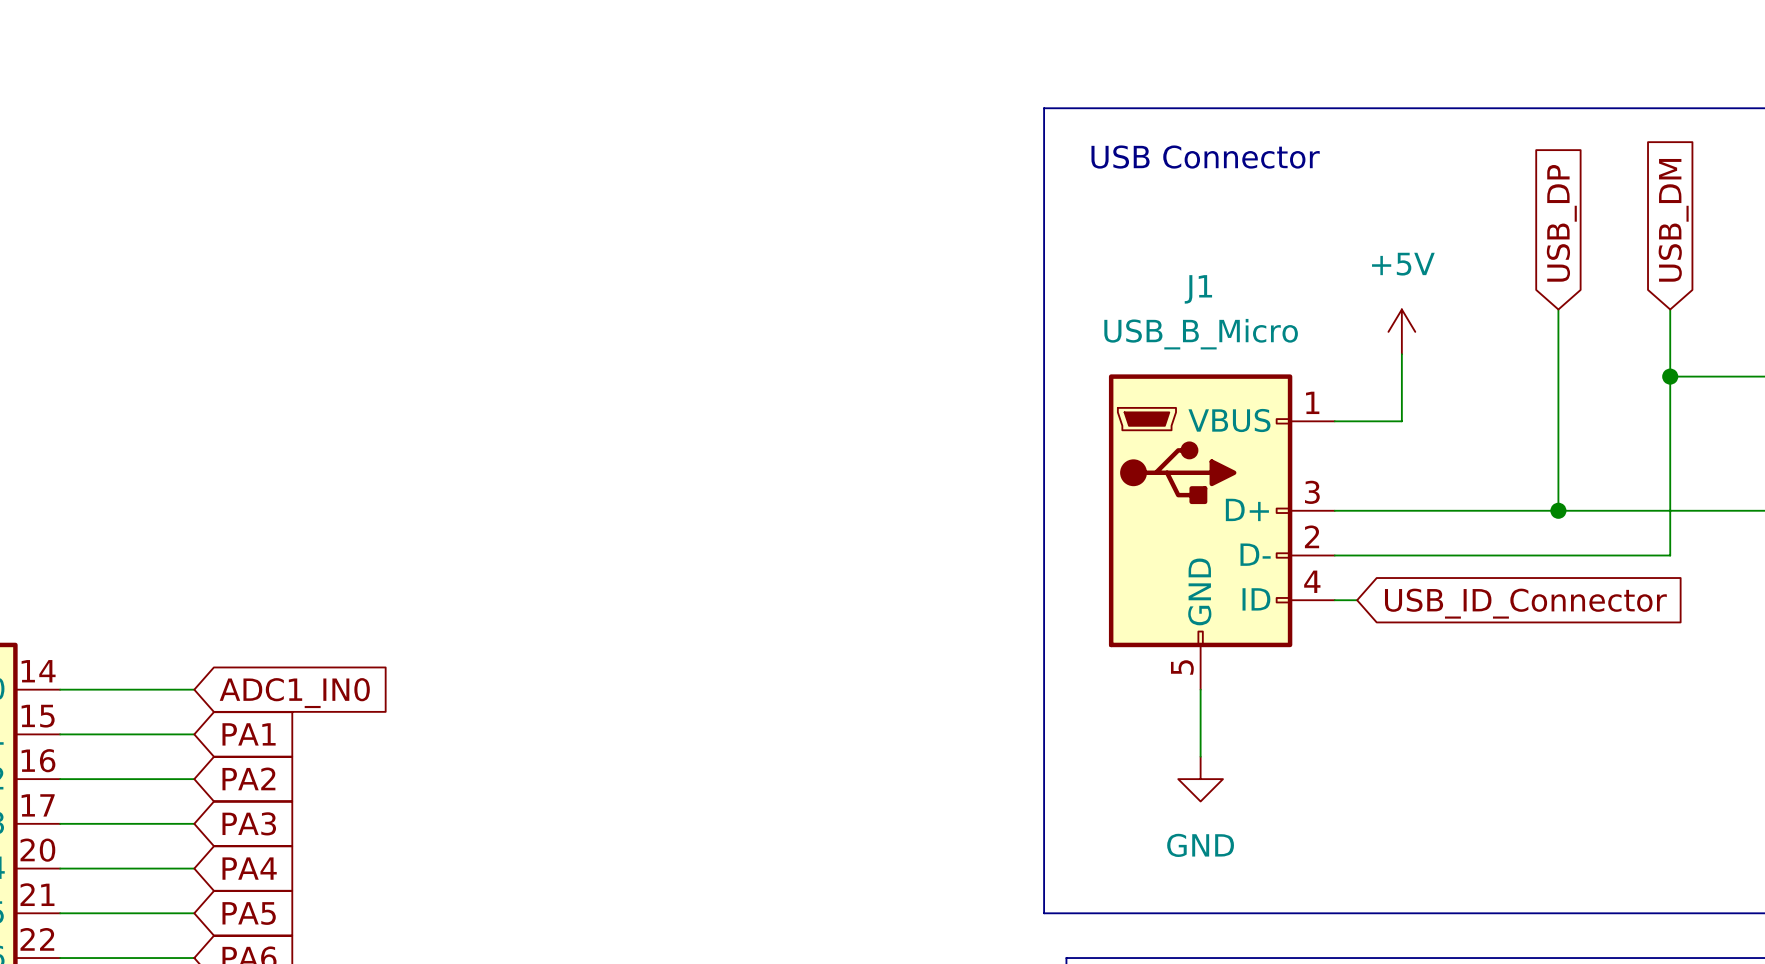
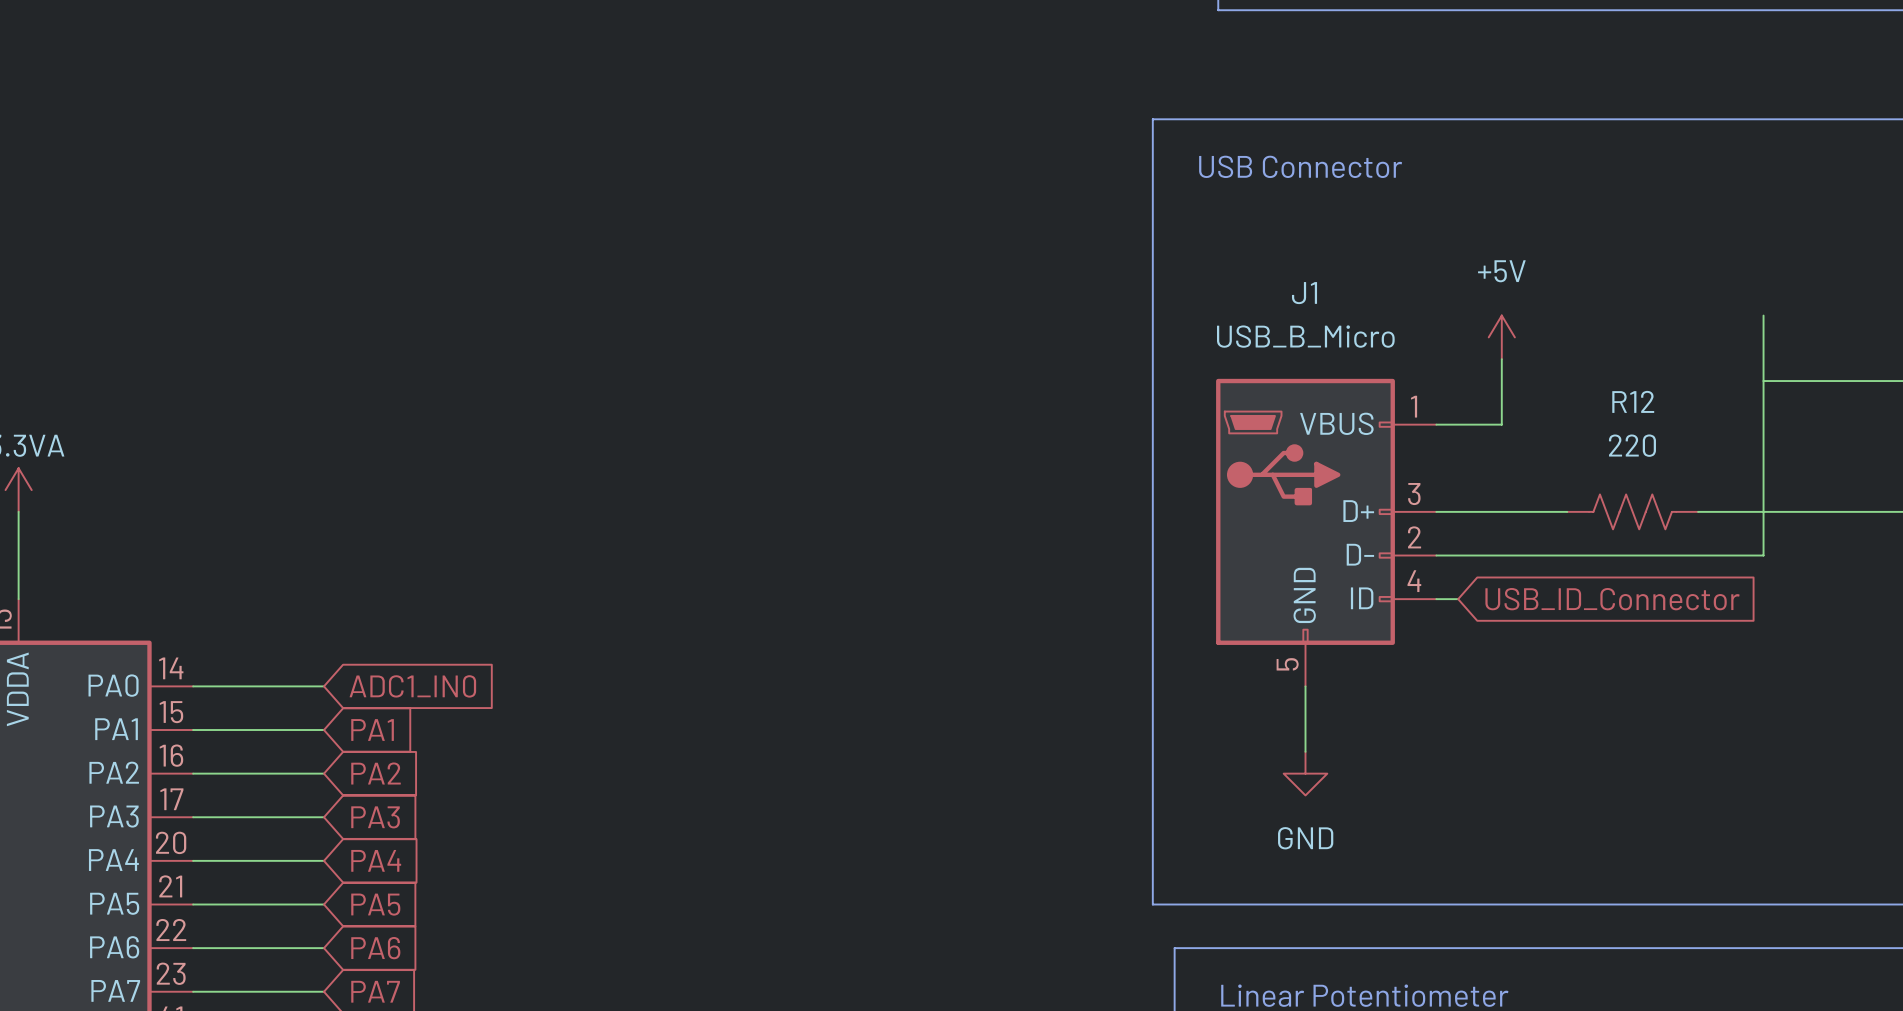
global label: USB_DM (1673, 220) -> none
global label: USB_DP (1561, 223) -> none
wire: (1558, 309) (1558, 510) -> none
junction: (1670, 376) -> none
wire: (1468, 510) (1603, 510) -> none
R12: none -> 220 (1632, 511)
junction: (1558, 510) -> none

